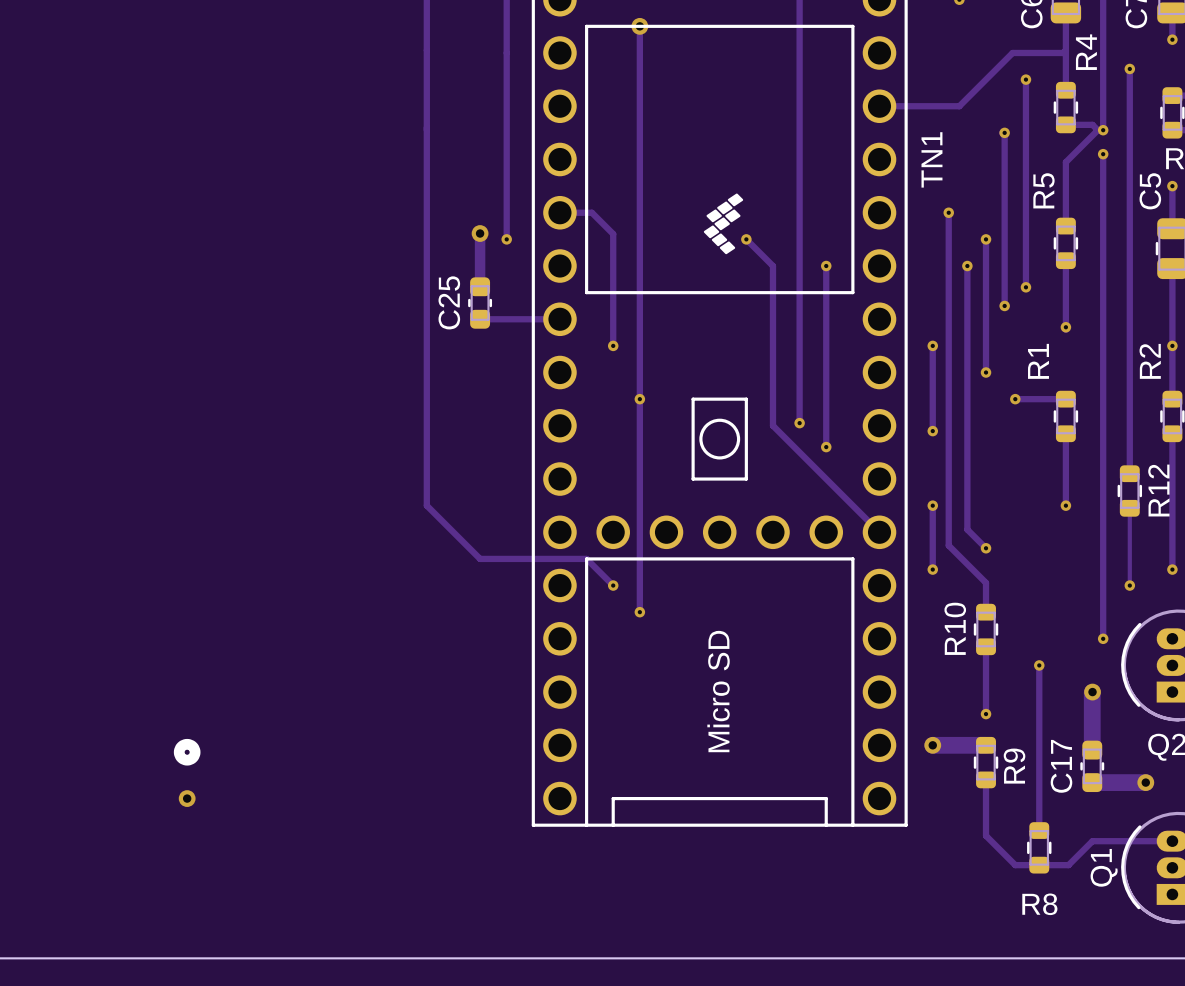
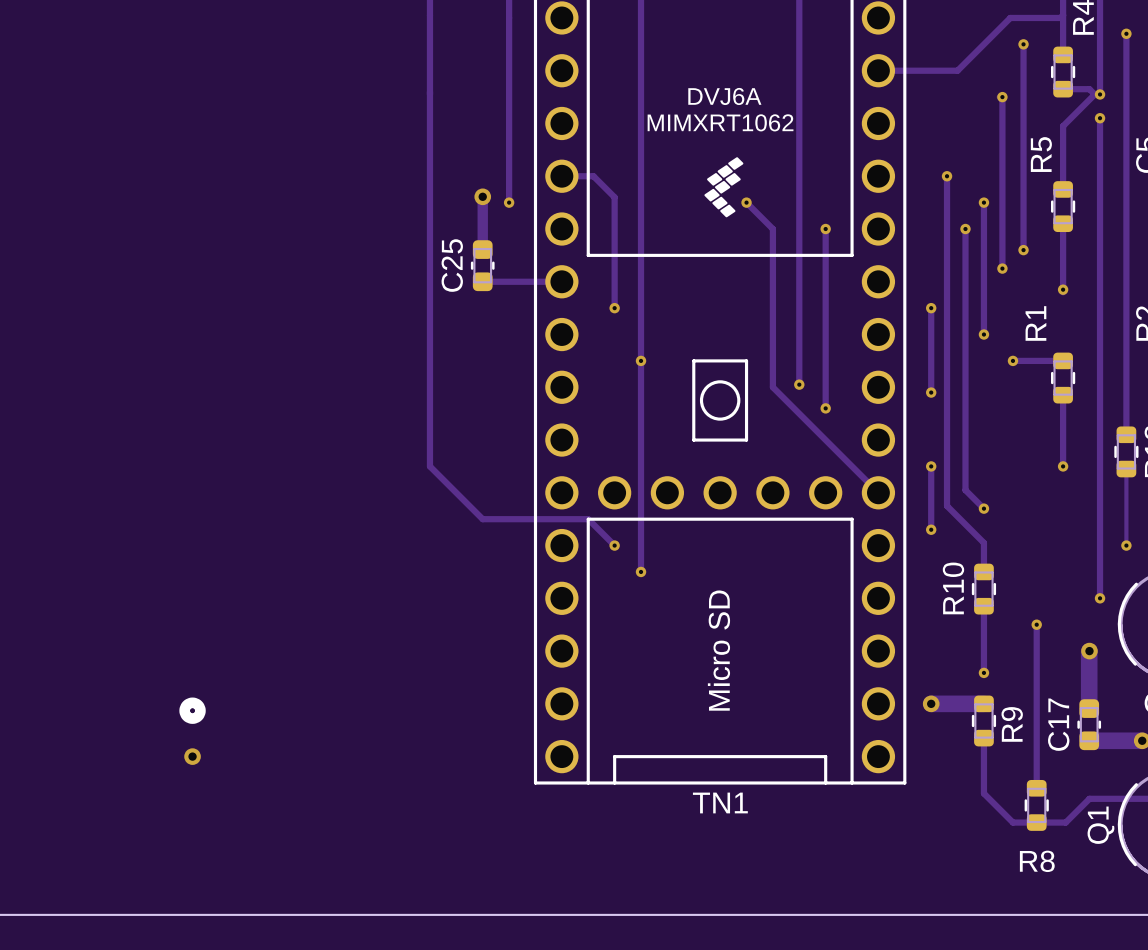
TN1 text: none -> DVJ6A (724, 96)
TN1 text: none -> MIMXRT1062 (720, 122)
TN1 name rotation: 0° (931, 159) -> 90° clockwise (720, 802)
TN1 name position: TN1 (931, 159) -> TN1 (720, 802)

